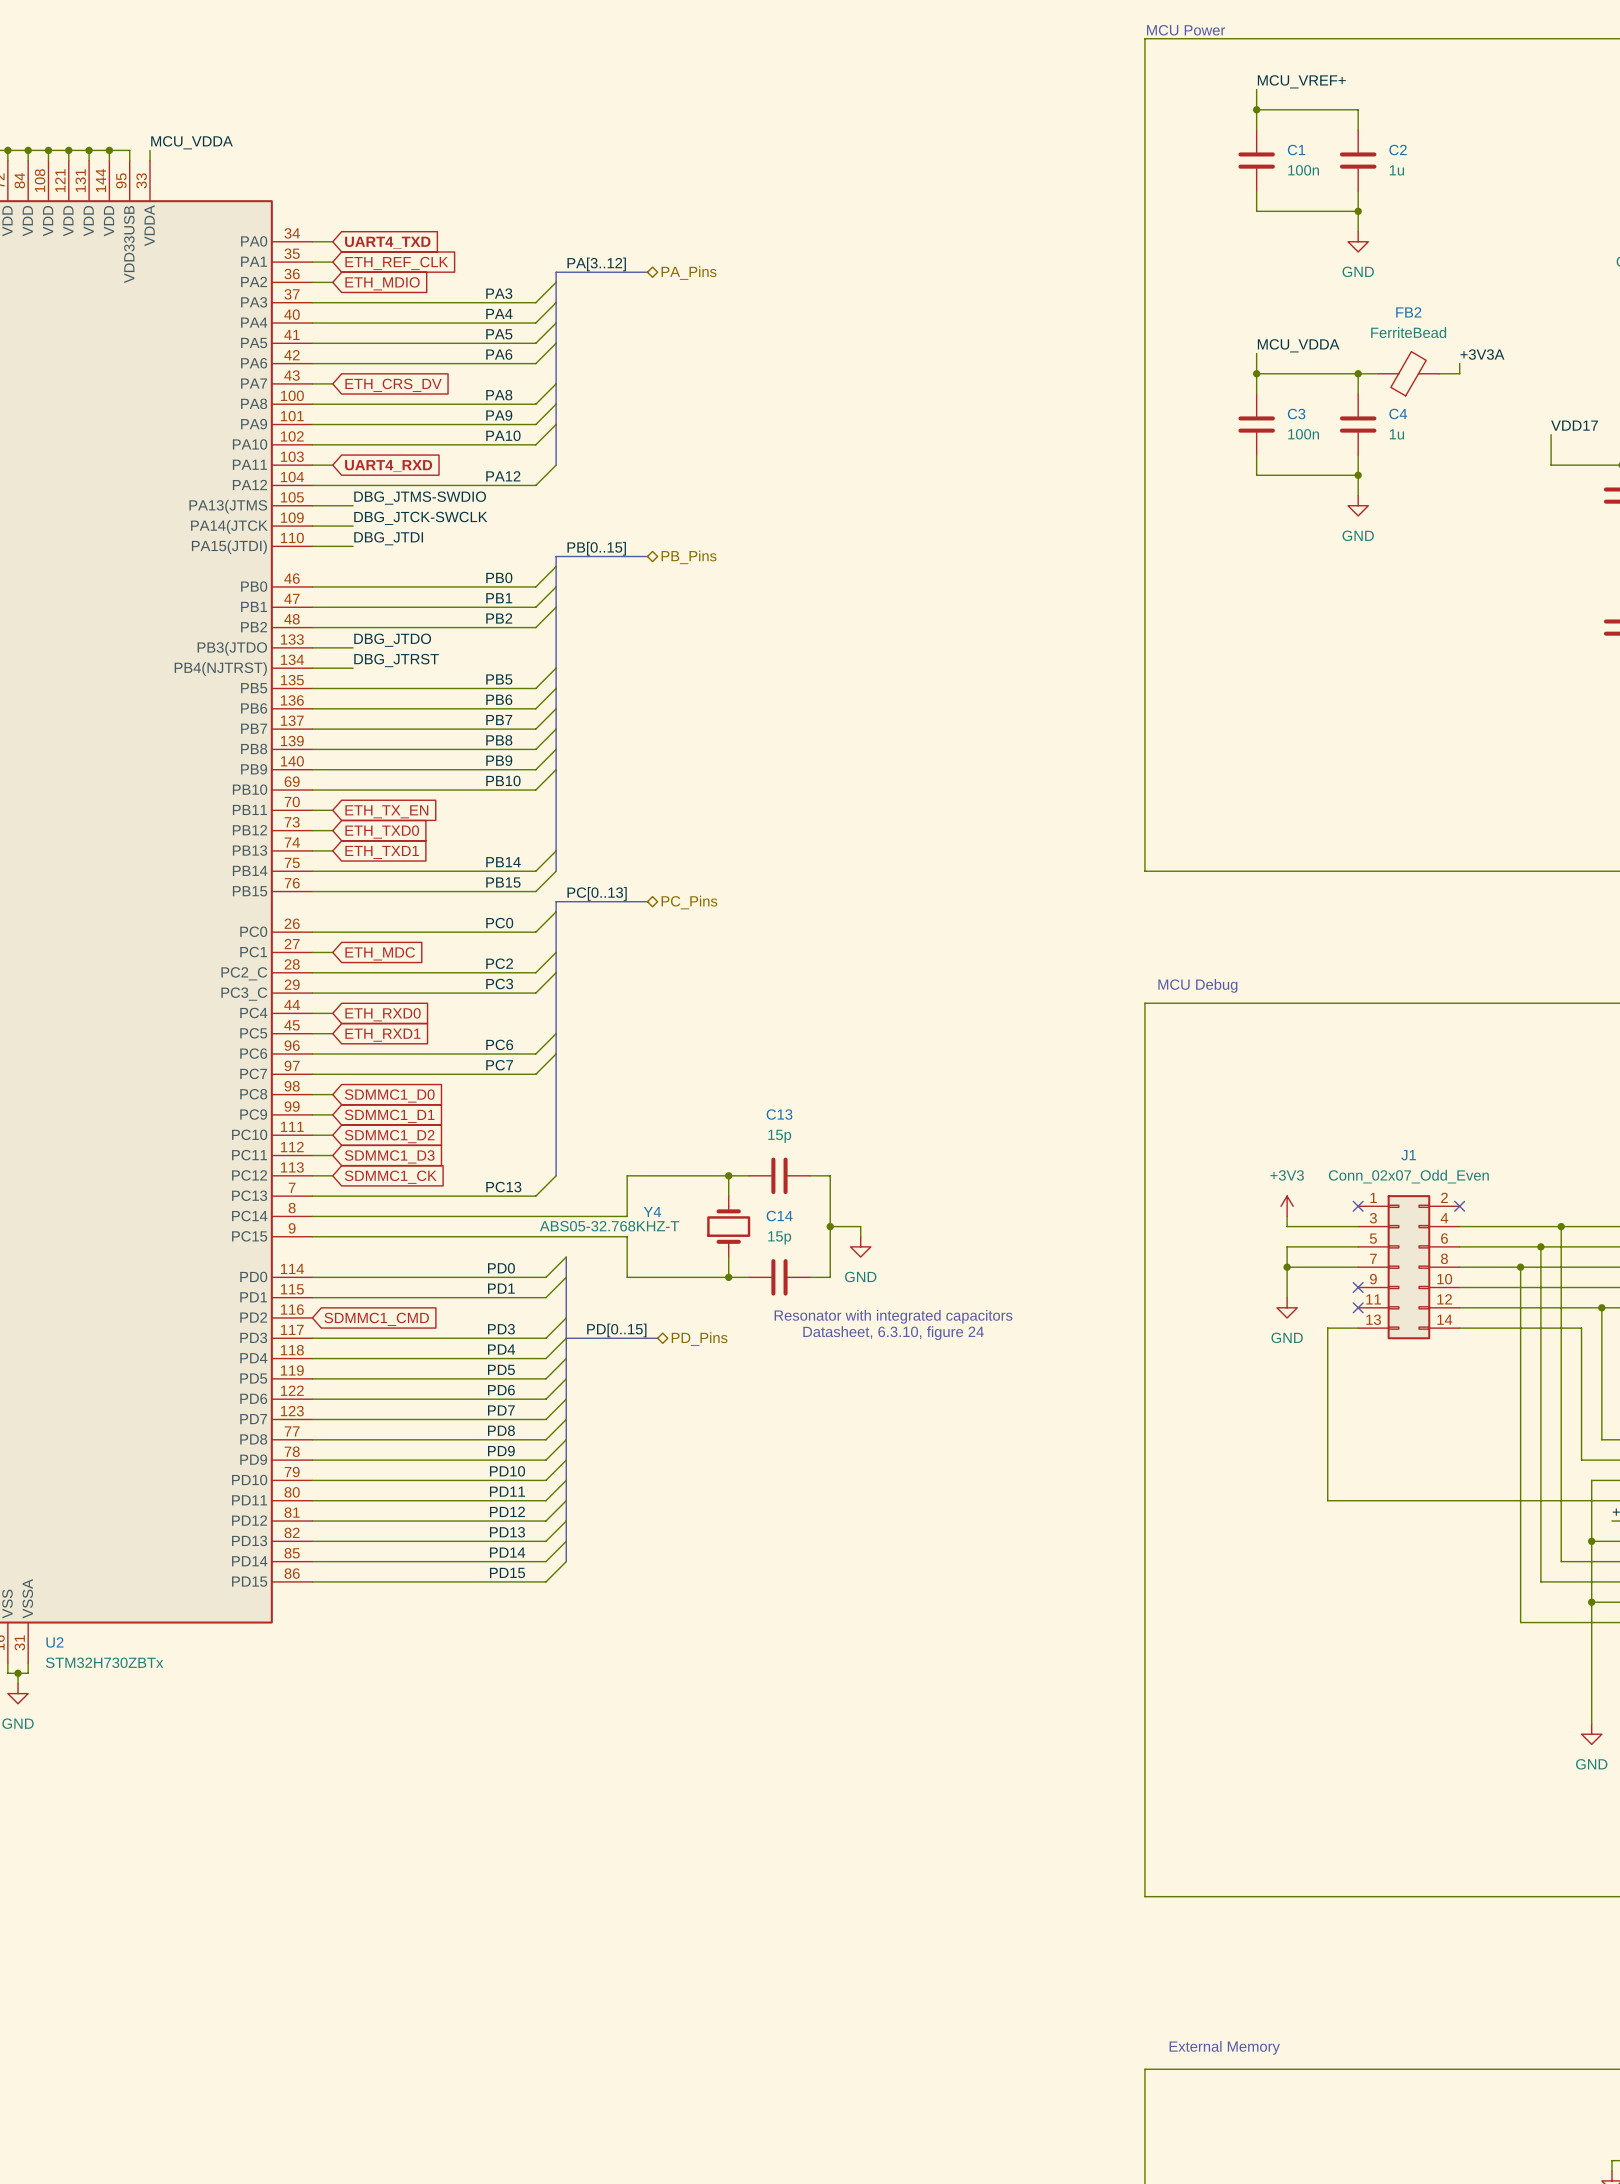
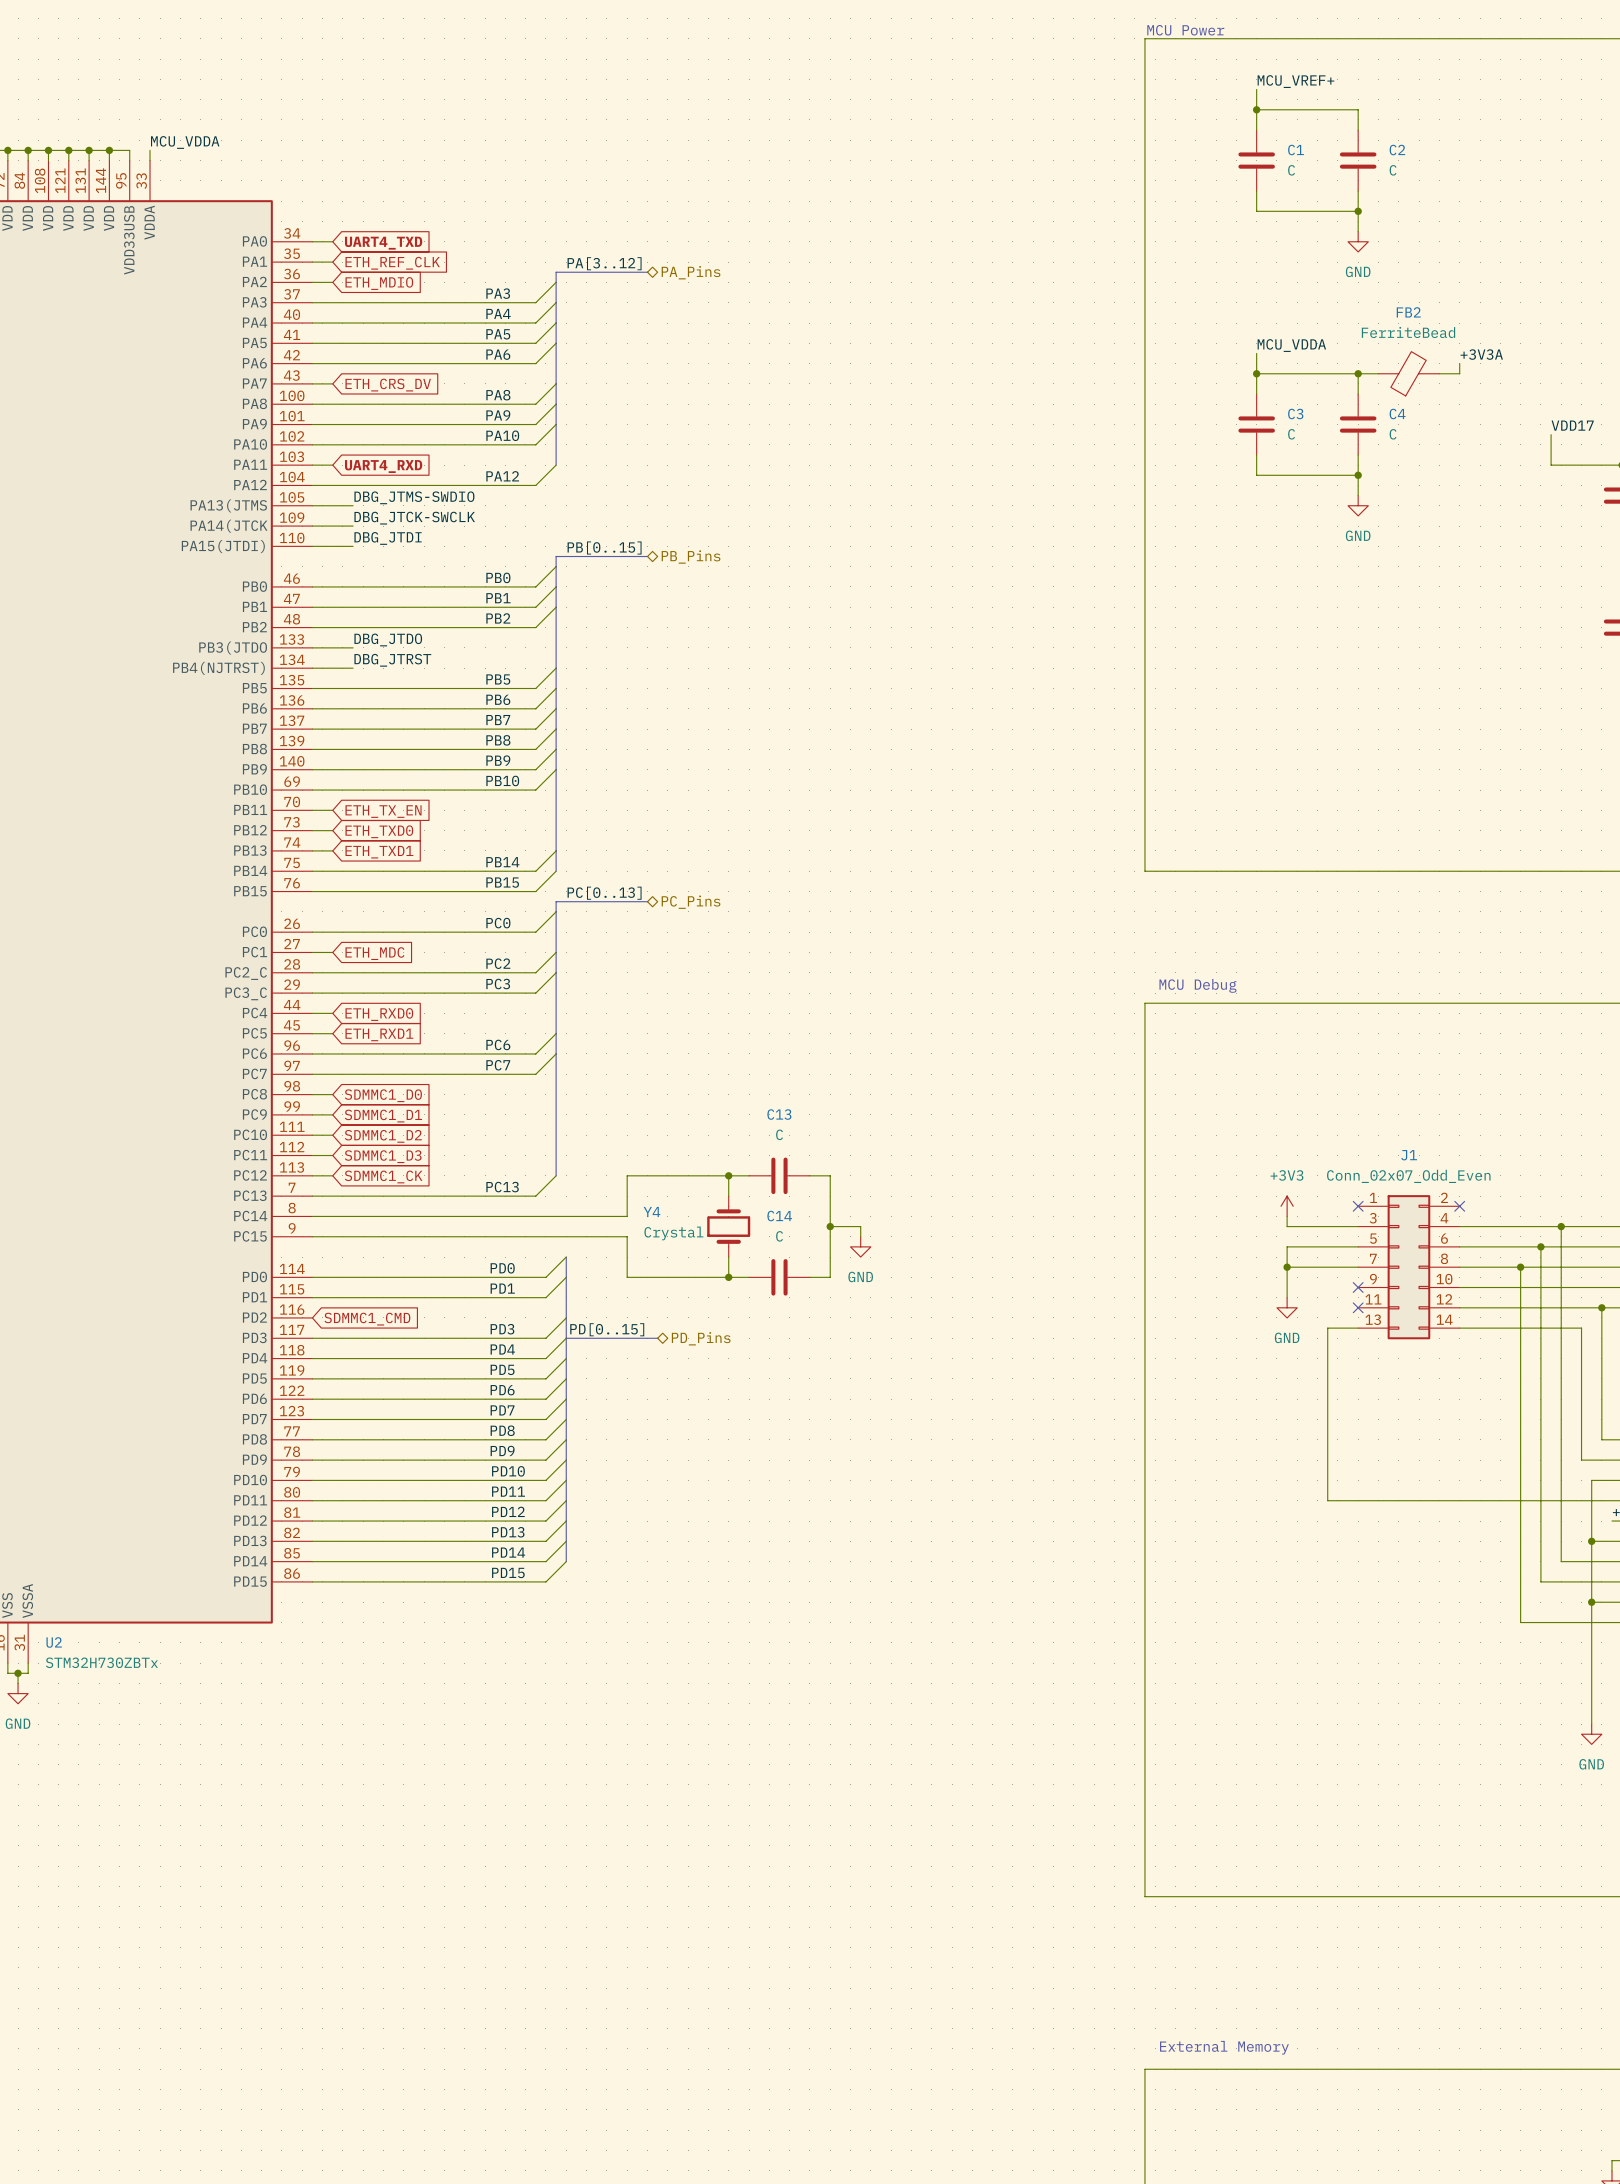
C1 value: 100n (1303, 170) -> C (1291, 170)
C2 value: 1u (1396, 170) -> C (1393, 170)
C3 value: 100n (1303, 434) -> C (1291, 434)
C4 value: 1u (1396, 434) -> C (1393, 434)
C13 value: 15p (779, 1136) -> C (779, 1134)
Y4 value: ABS05-32.768KHZ-T (609, 1226) -> Crystal (673, 1233)
C14 value: 15p (779, 1237) -> C (779, 1236)
text: Resonator with integrated capacitors (893, 1316) -> none
text: Datasheet, 6.3.10, figure 24 (893, 1333) -> none

